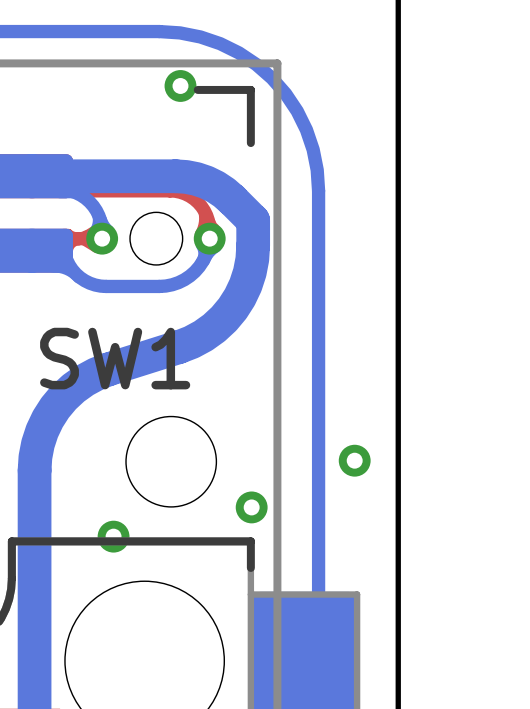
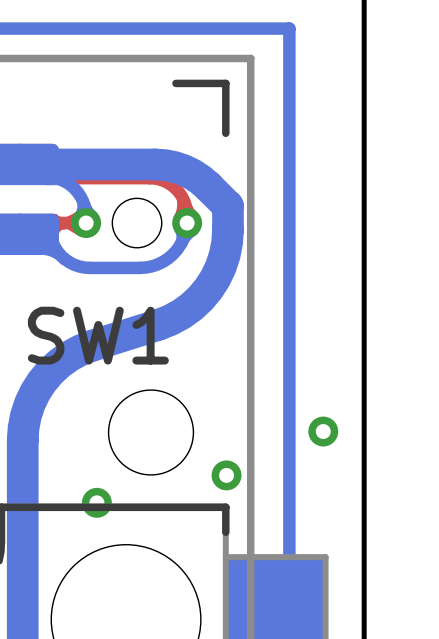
bottom track: (159, 31) (200, 36) (220, 43) (256, 64) (271, 78) (285, 93) (306, 129) (313, 149) (318, 190) -> (139, 28) (289, 28) (289, 178)
via: (180, 85) -> none

